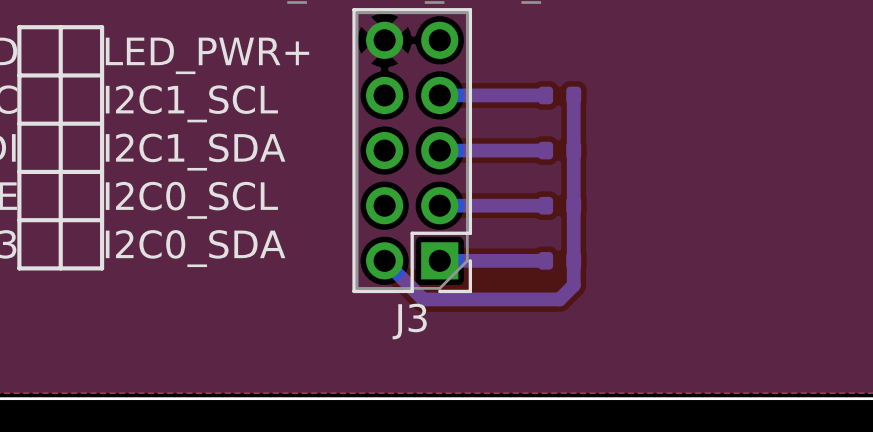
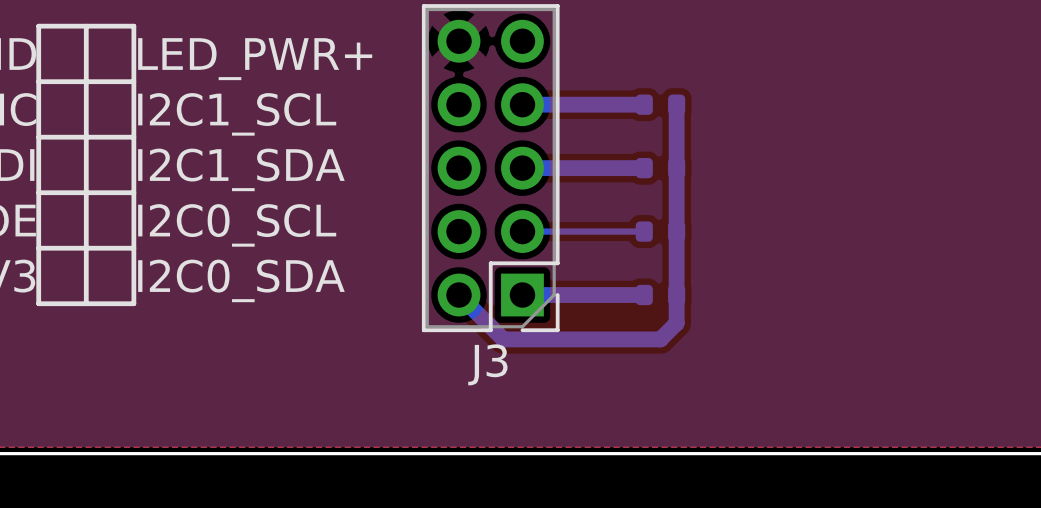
bottom track width: thick (439, 205) (545, 205) -> thin (522, 231) (644, 231)

